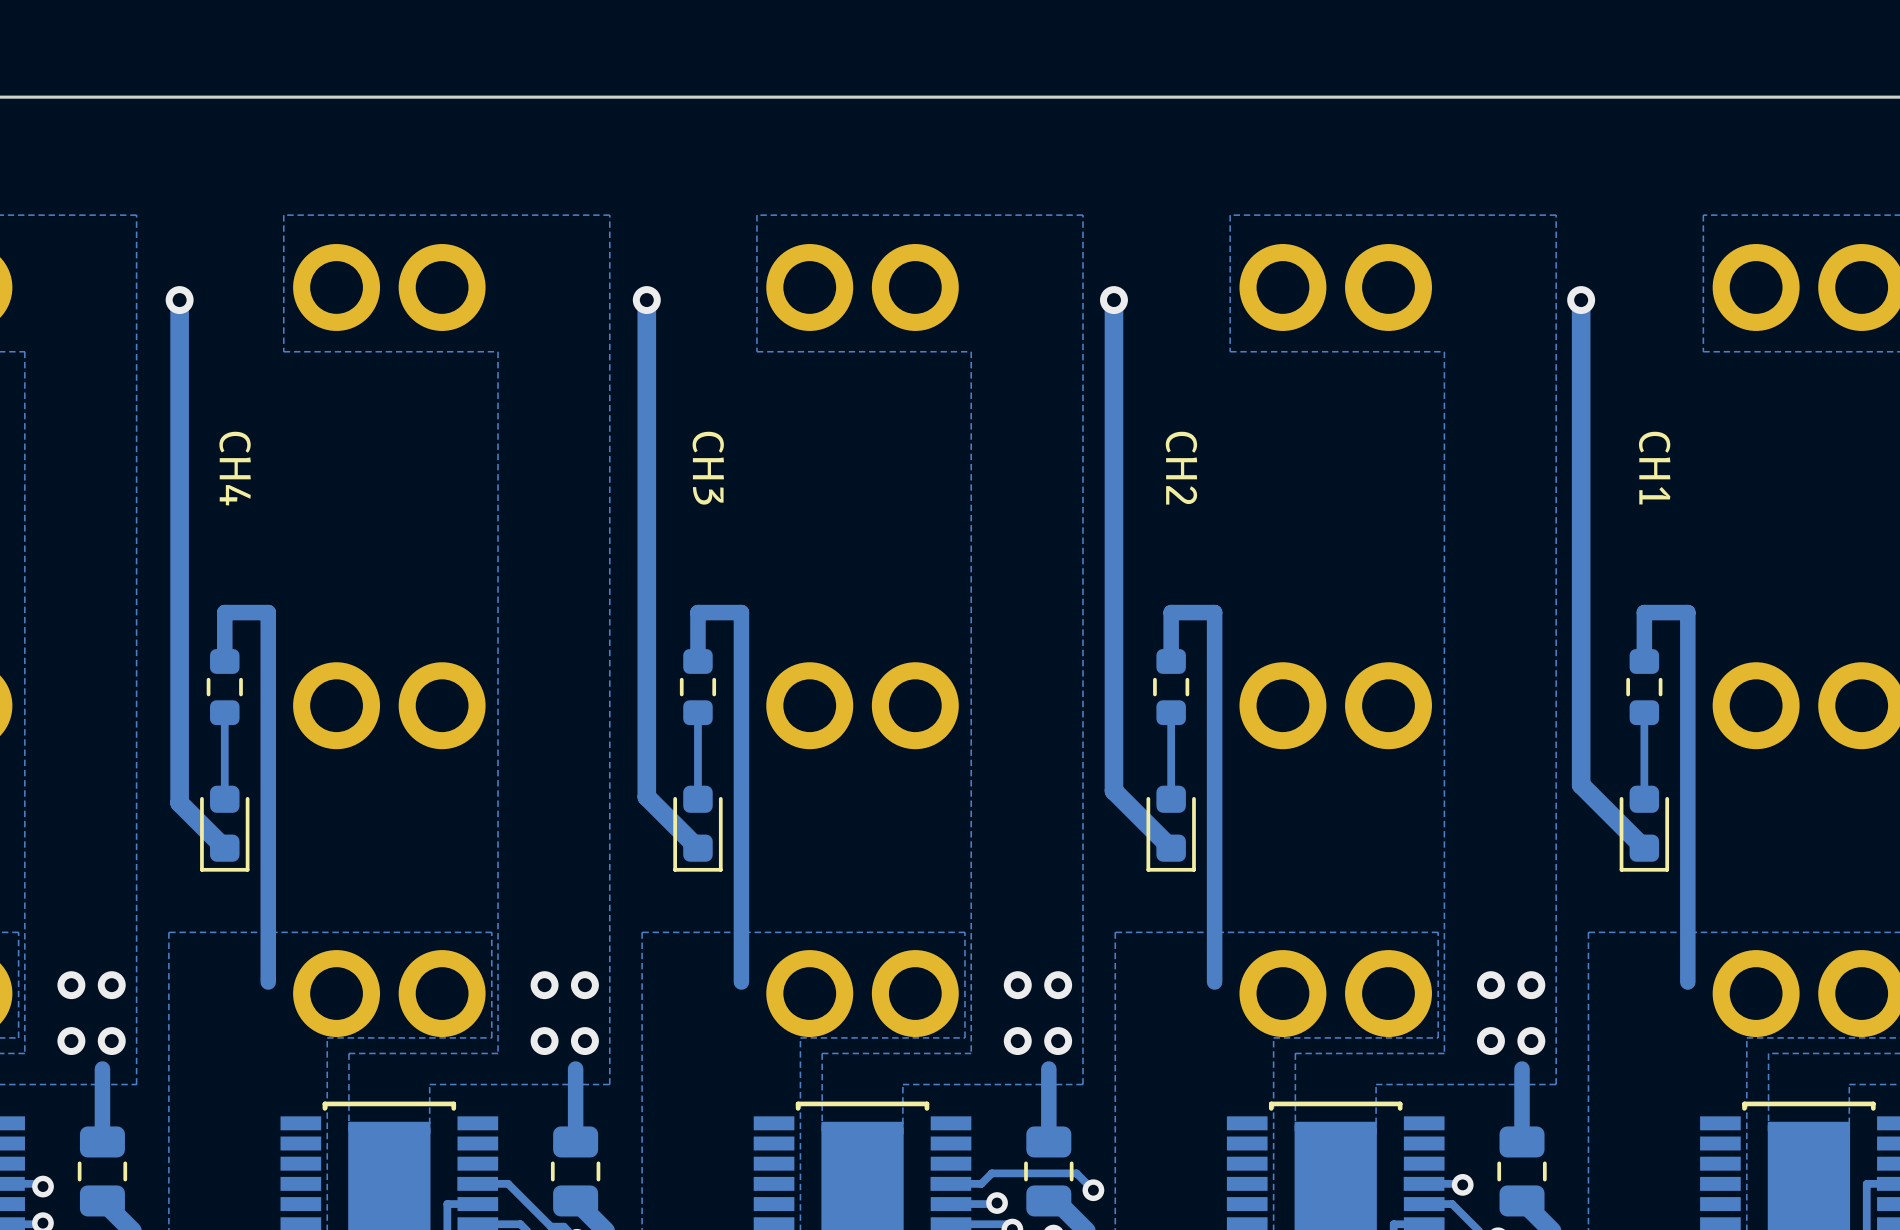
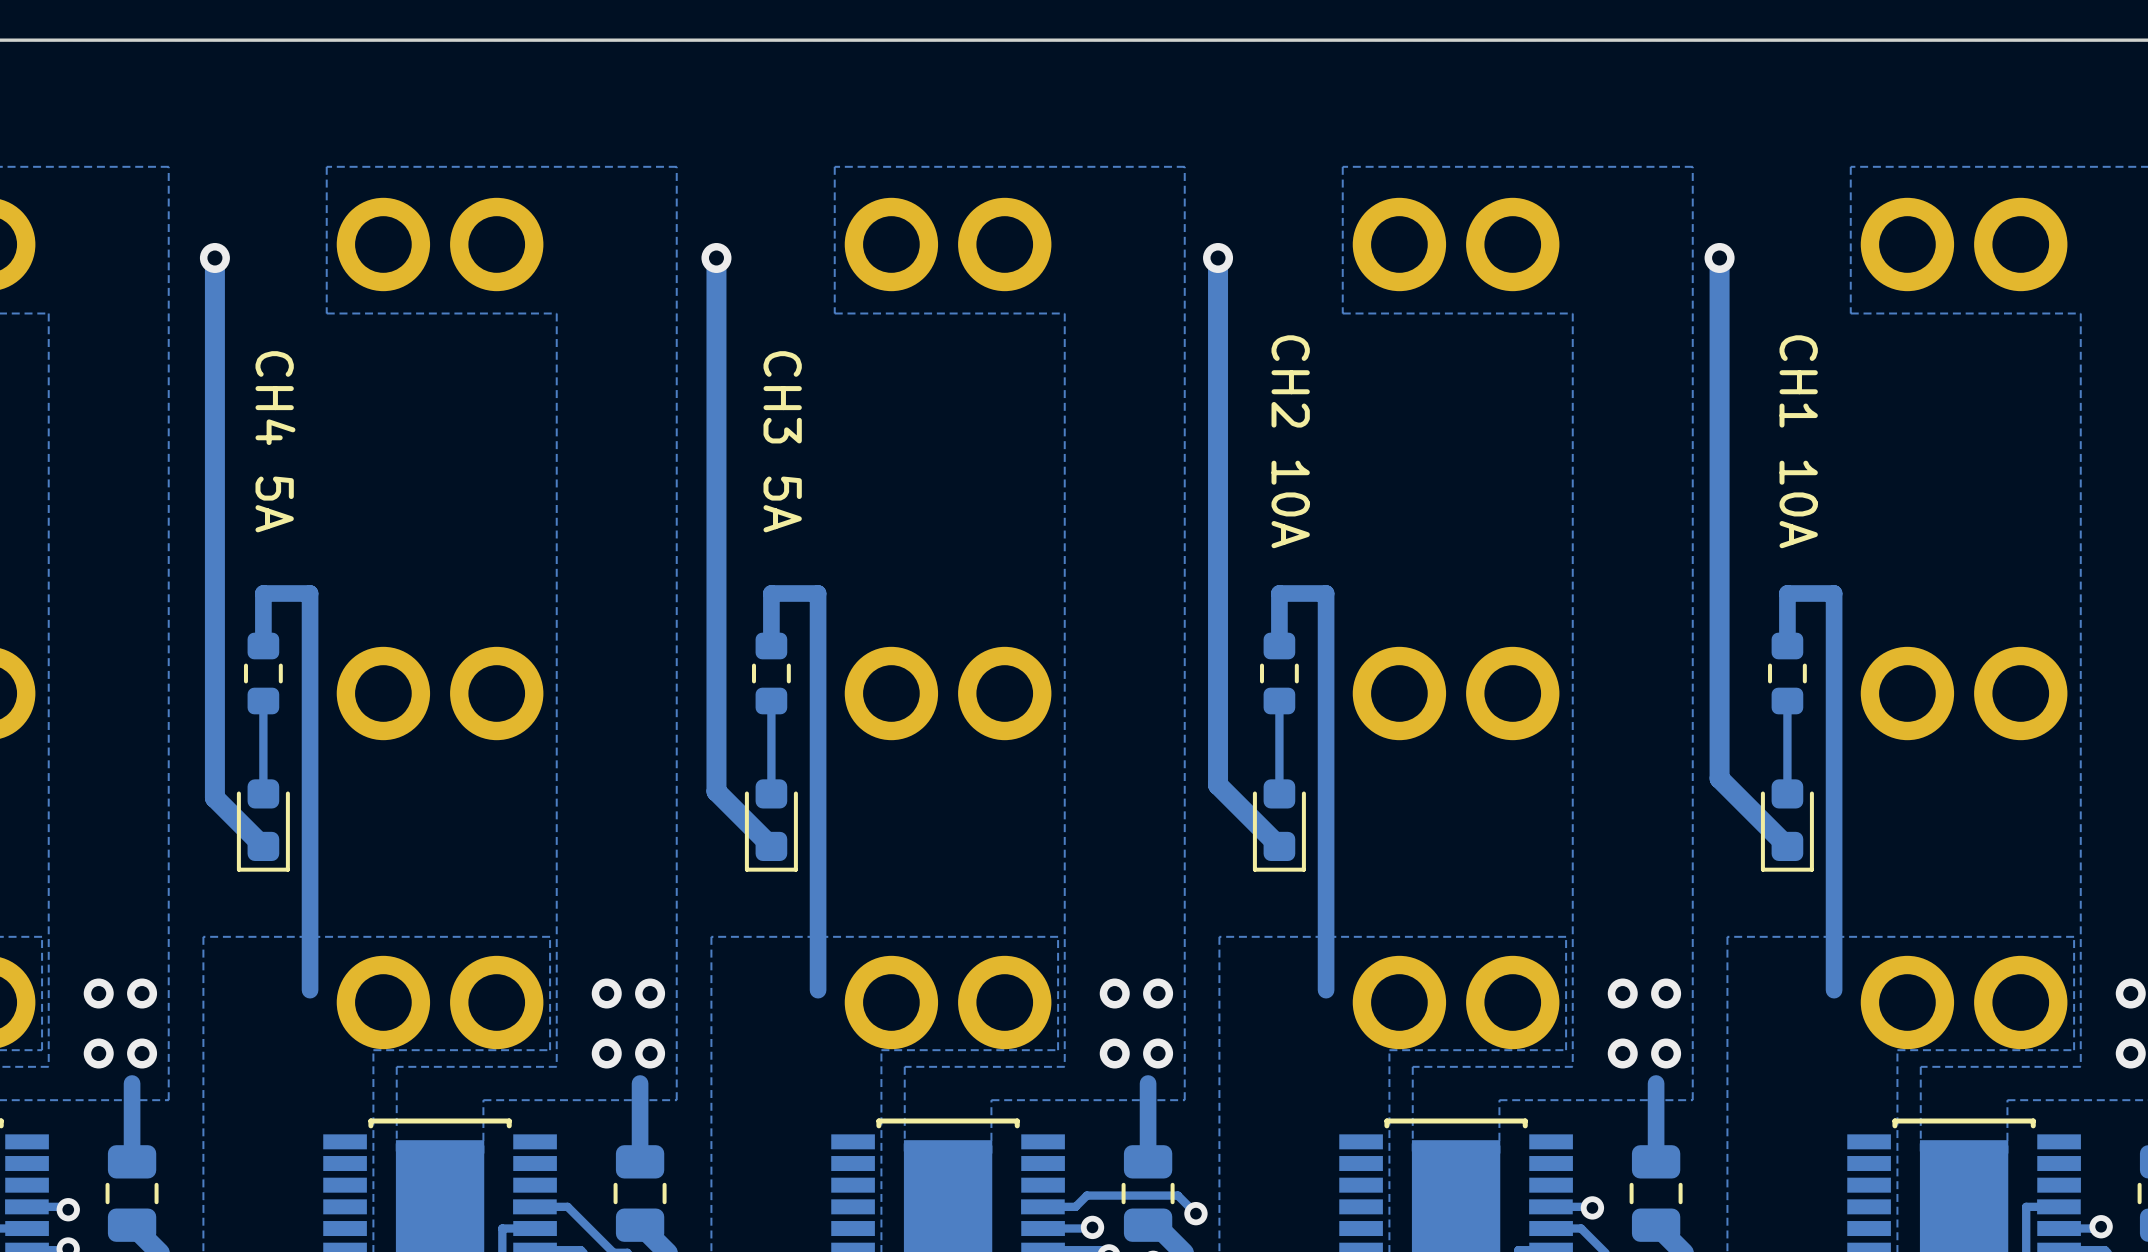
text: CH4 (235, 468) -> CH4 5A (275, 441)
text: CH3 (708, 468) -> CH3 5A (782, 441)
text: CH2 (1181, 468) -> CH2 10A (1290, 441)
text: CH1 (1654, 468) -> CH1 10A (1798, 441)

